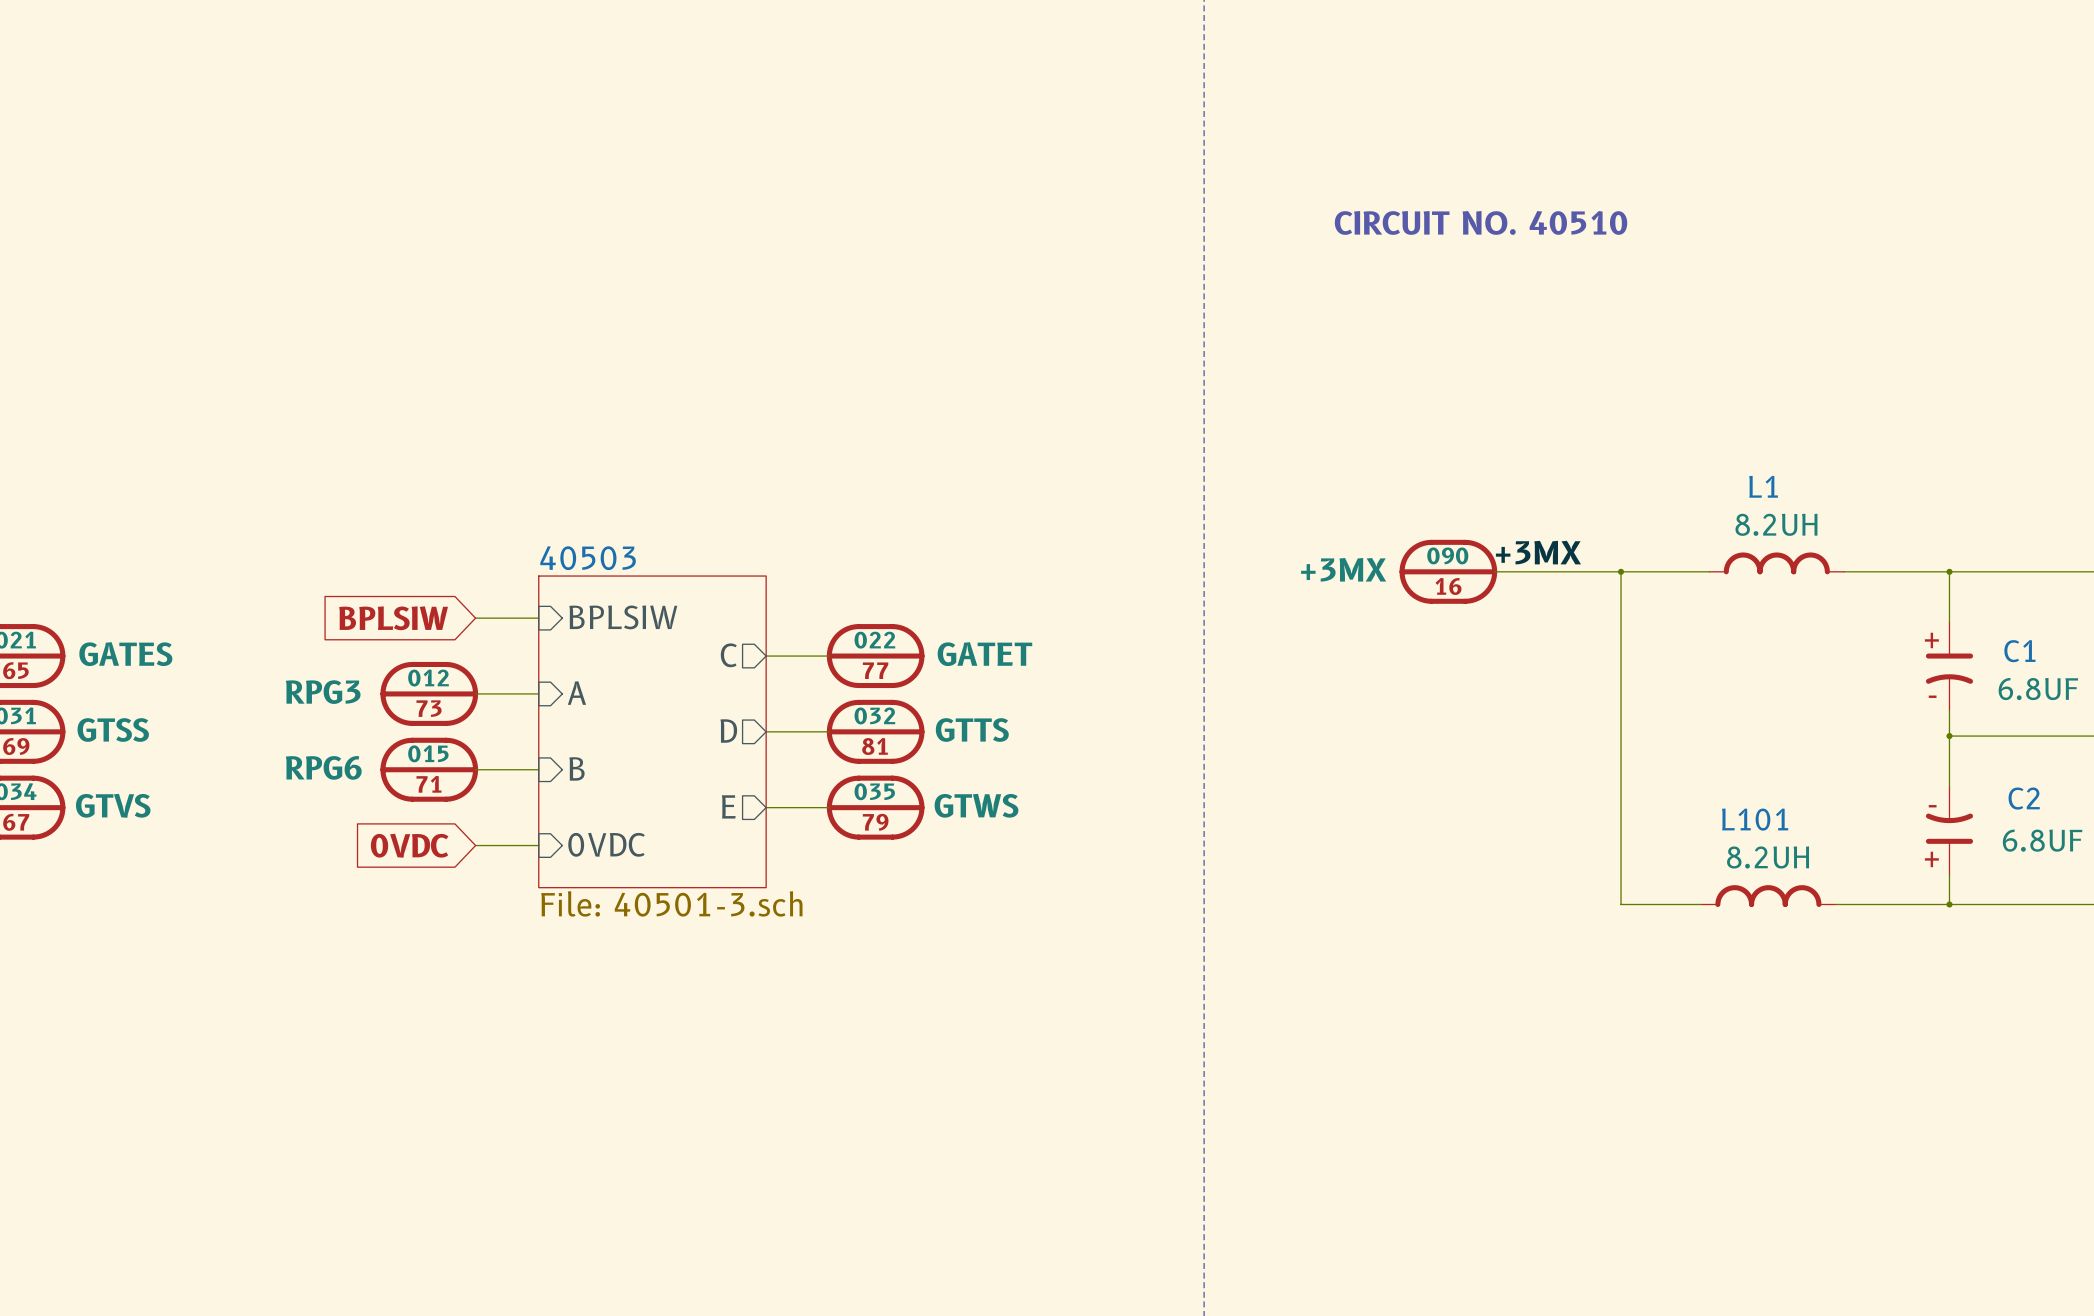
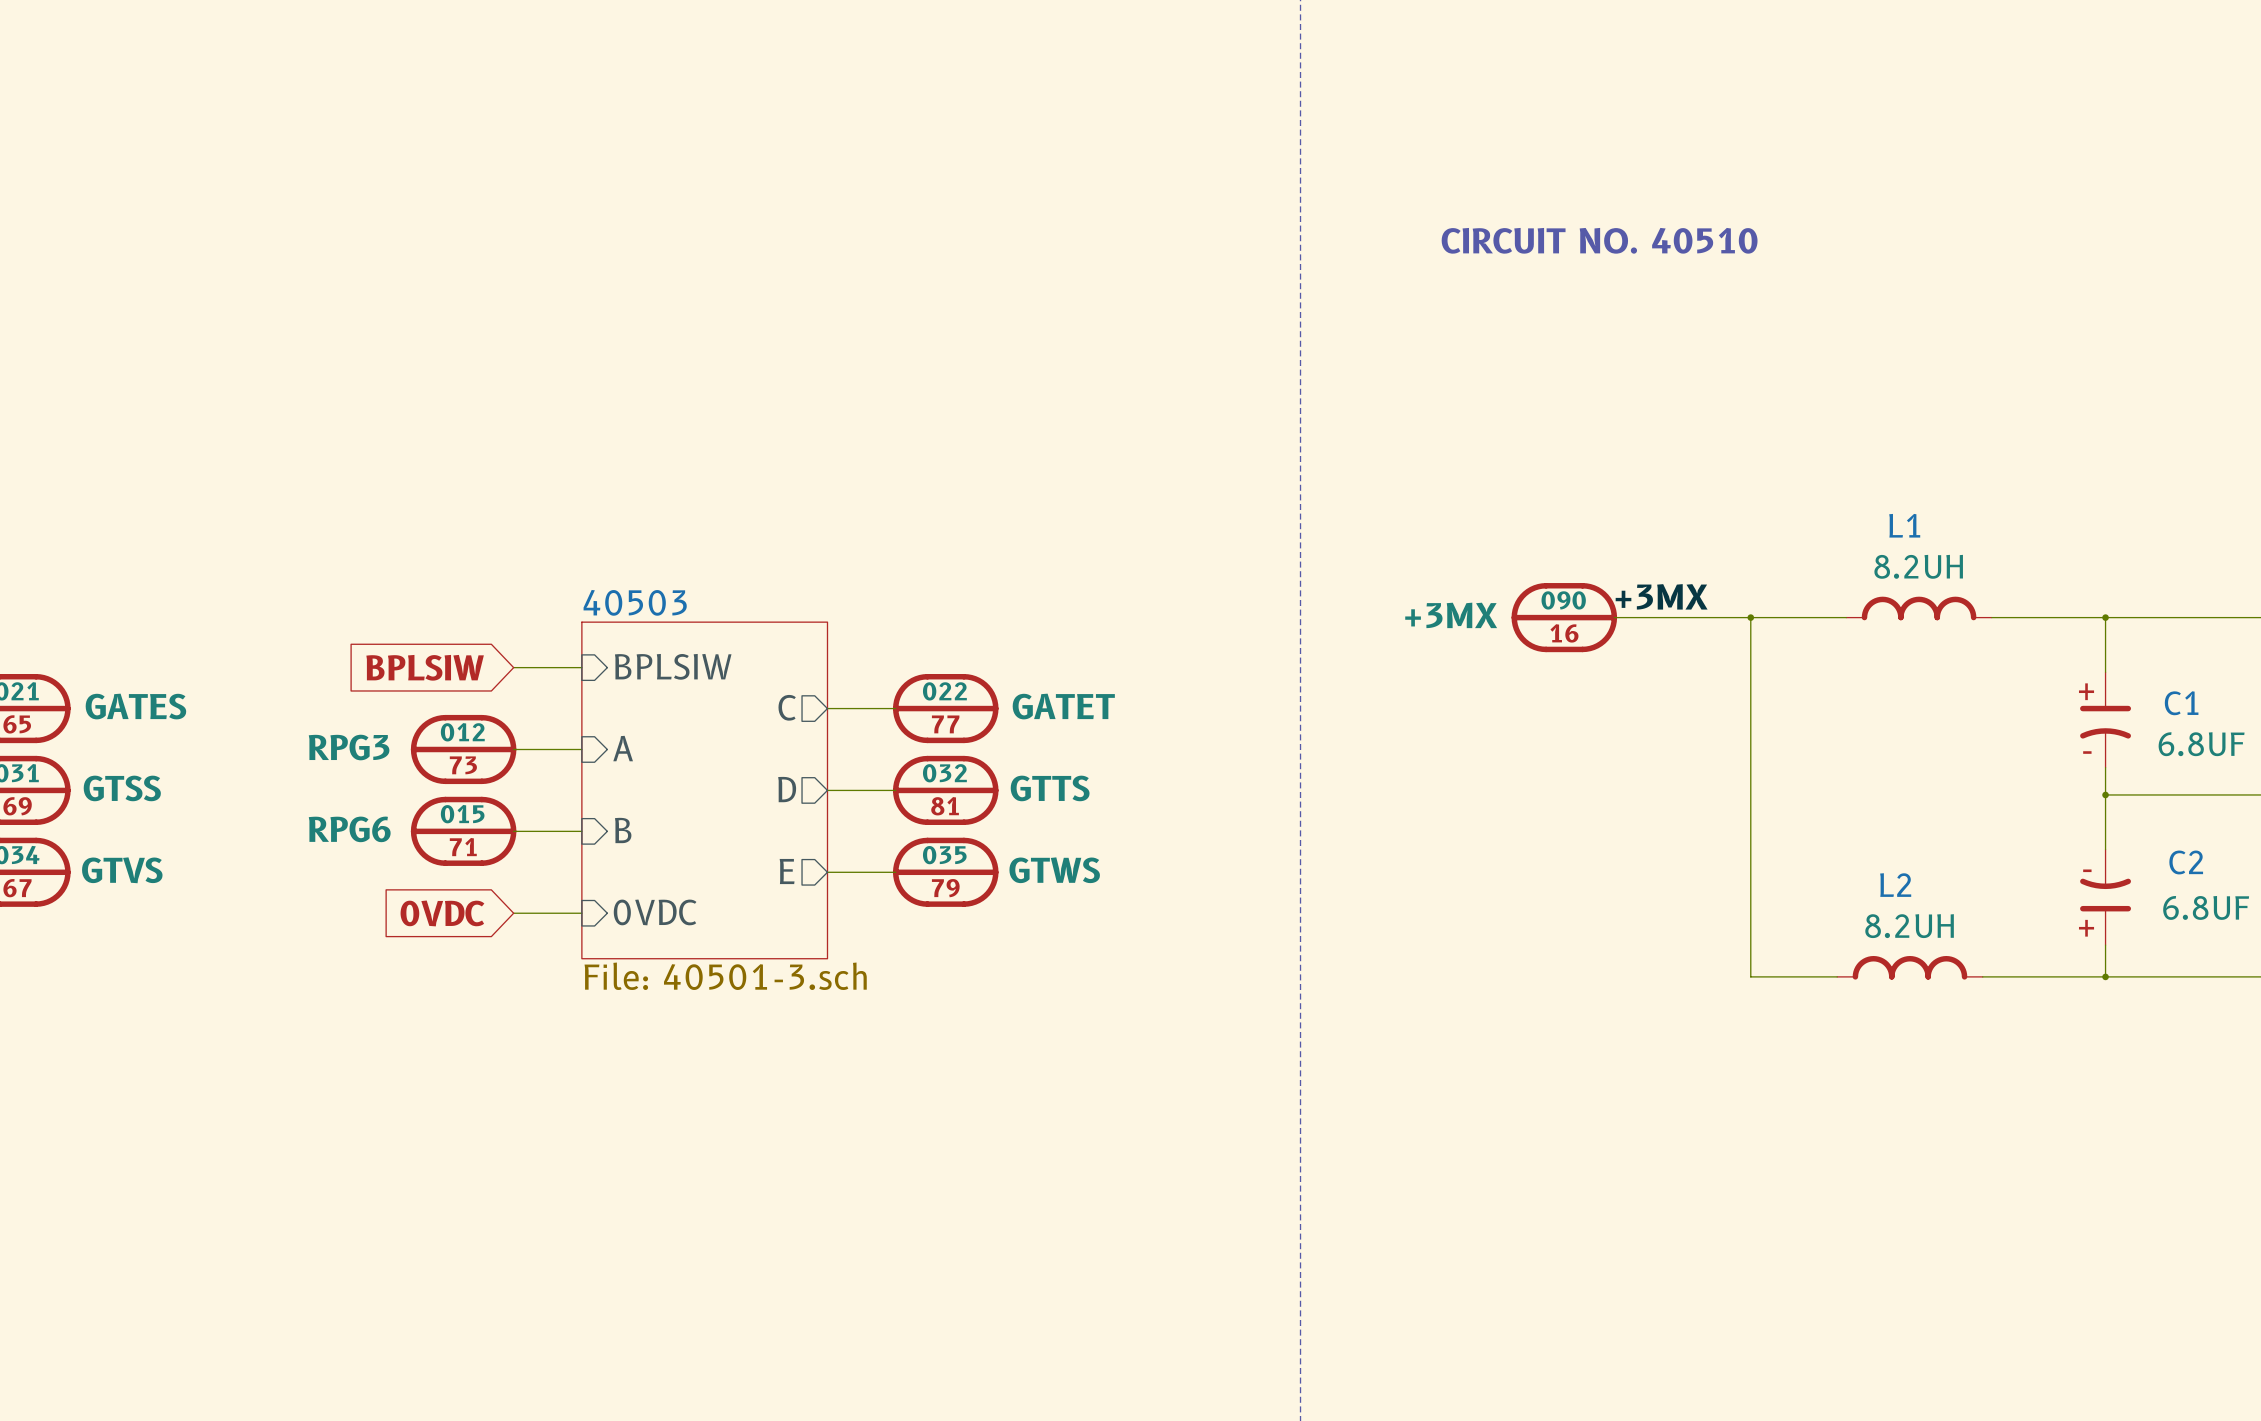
L101 name: L101 (1755, 819) -> L2 (1895, 885)

